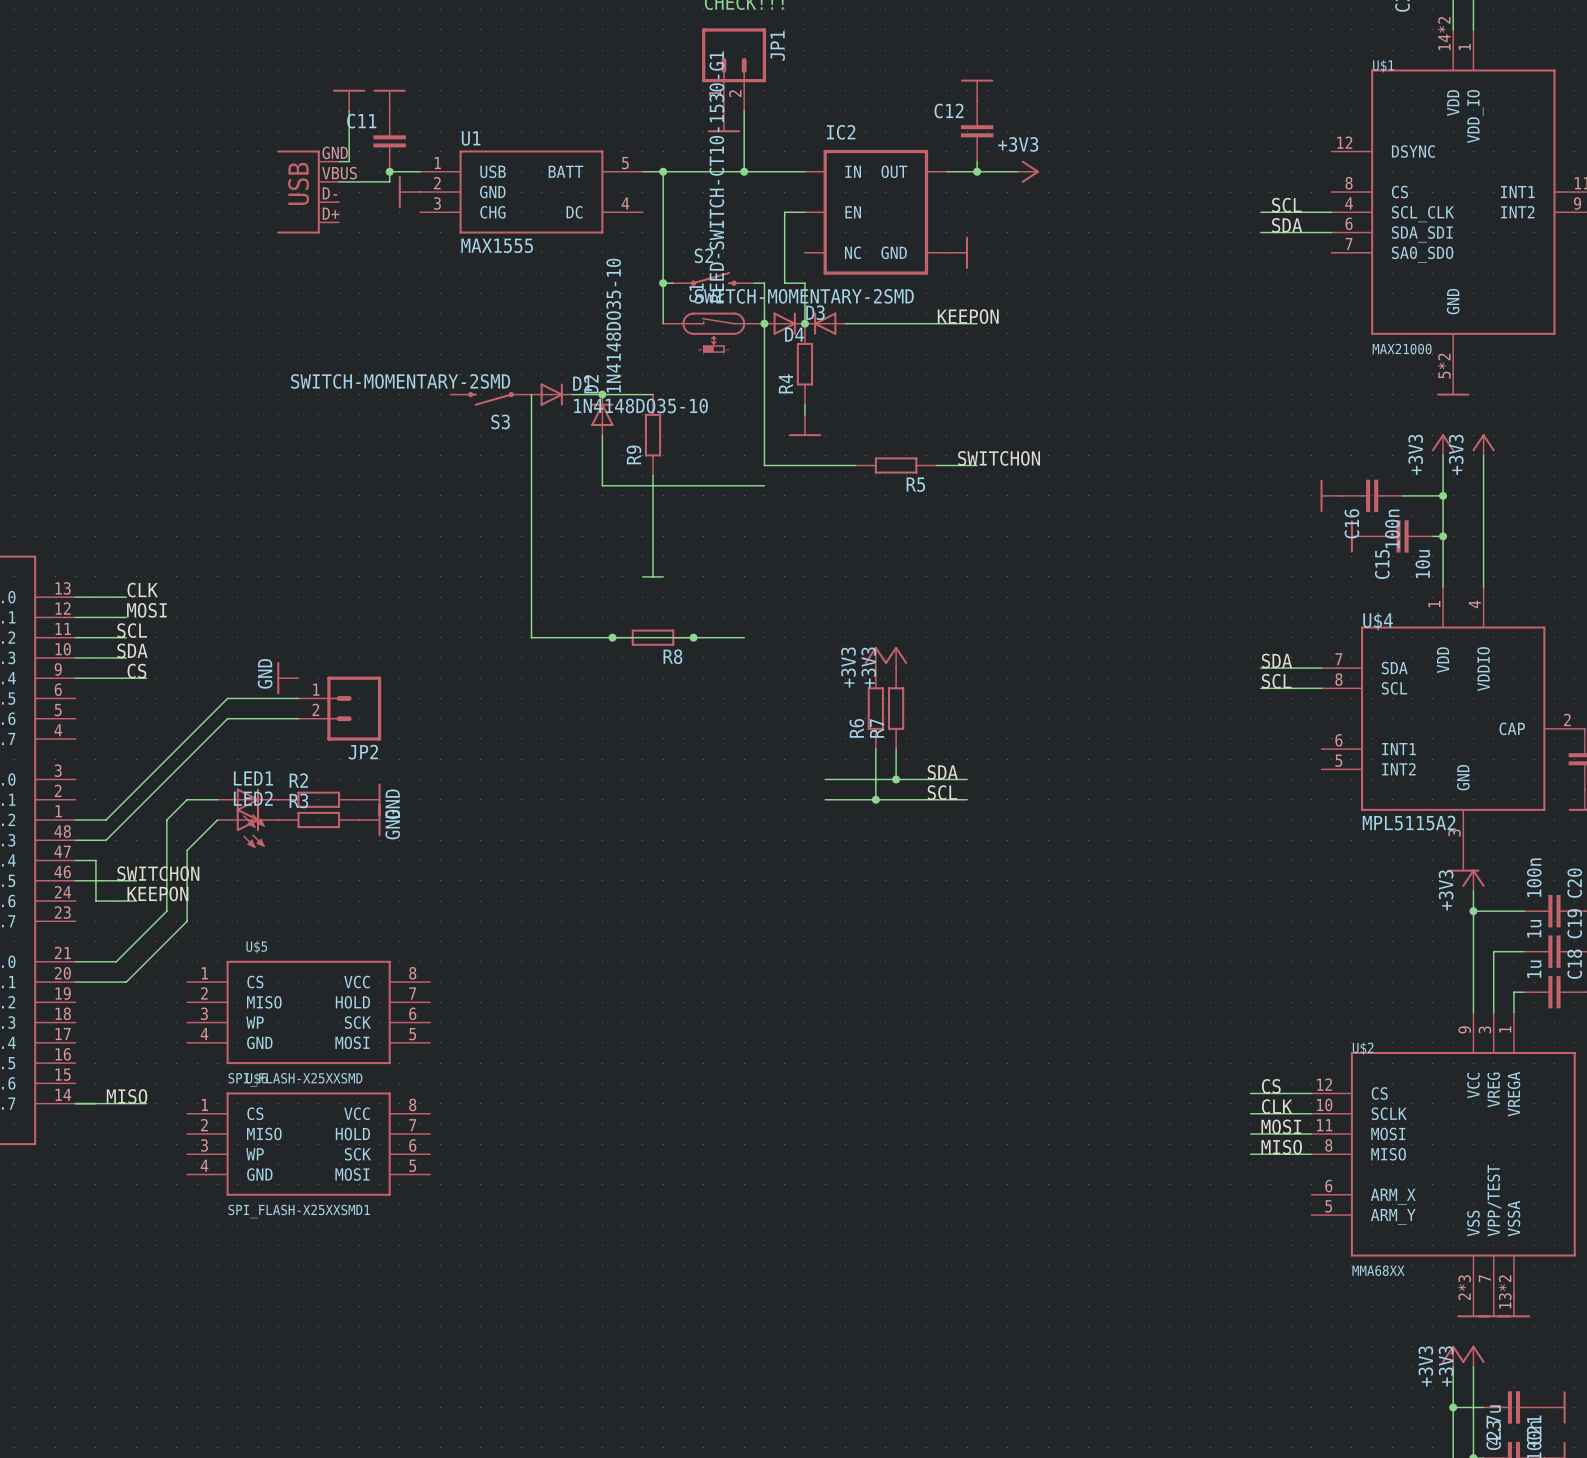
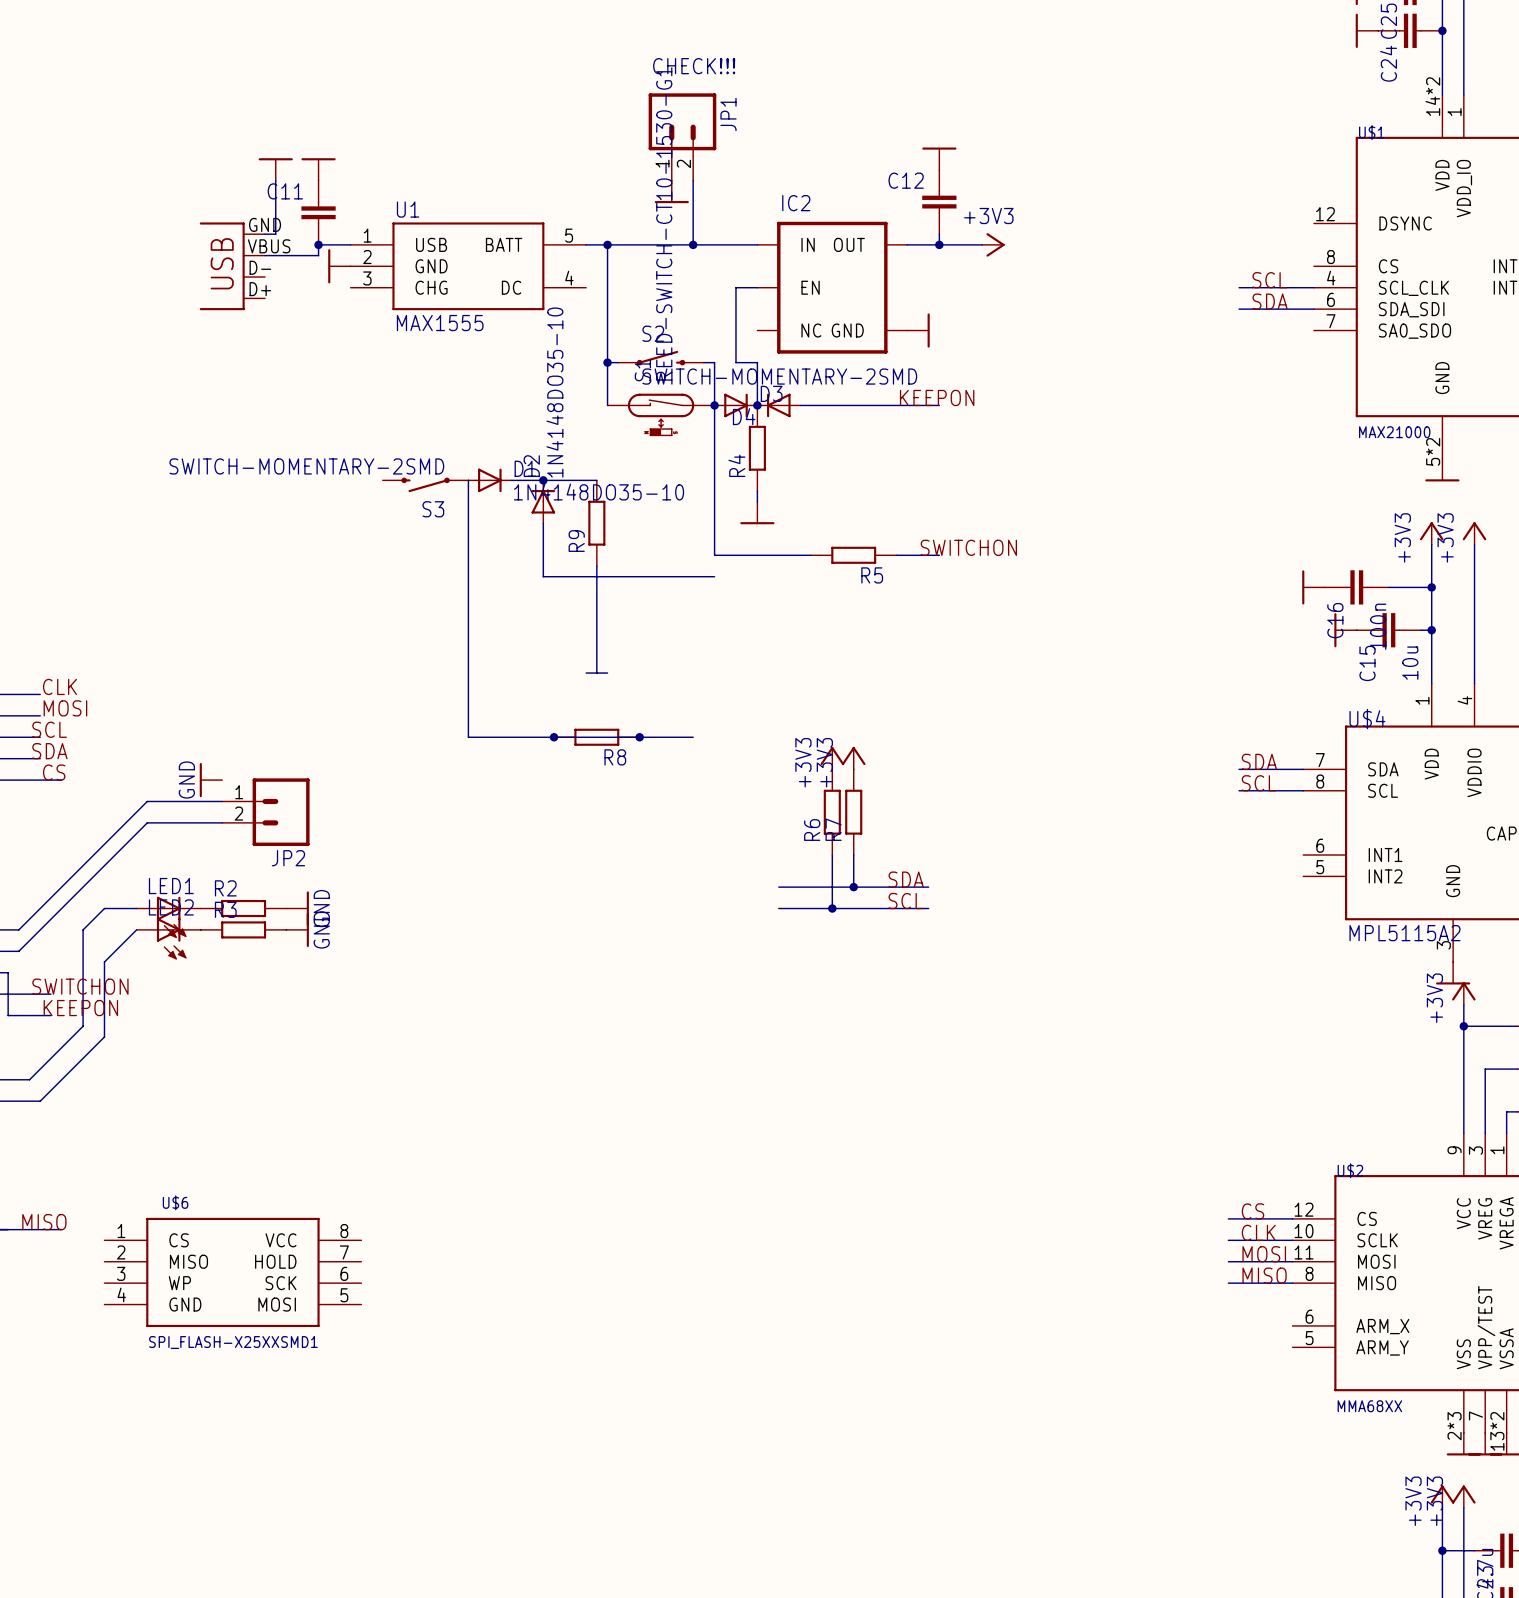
U$5: SPI_FLASH-X25XXSMD (308, 1012) -> none

